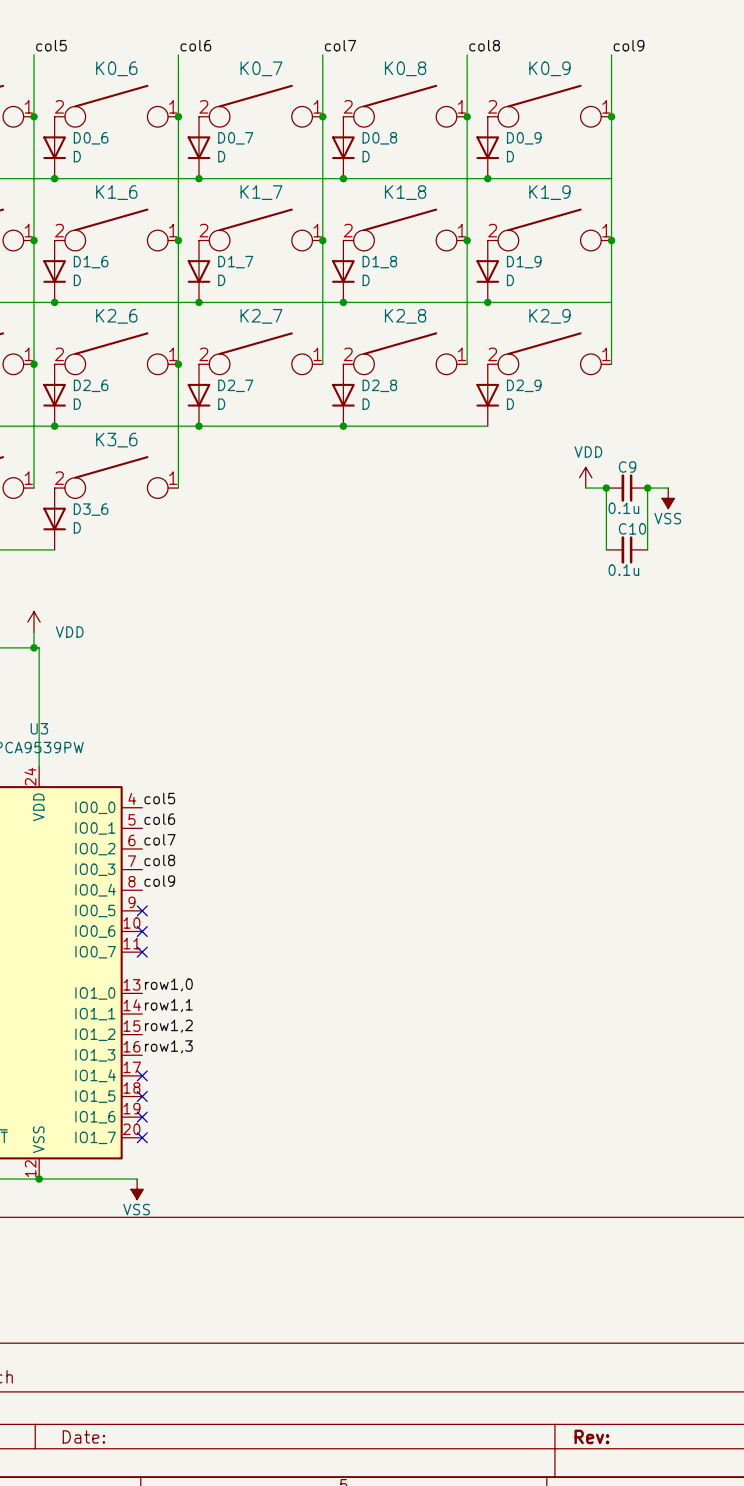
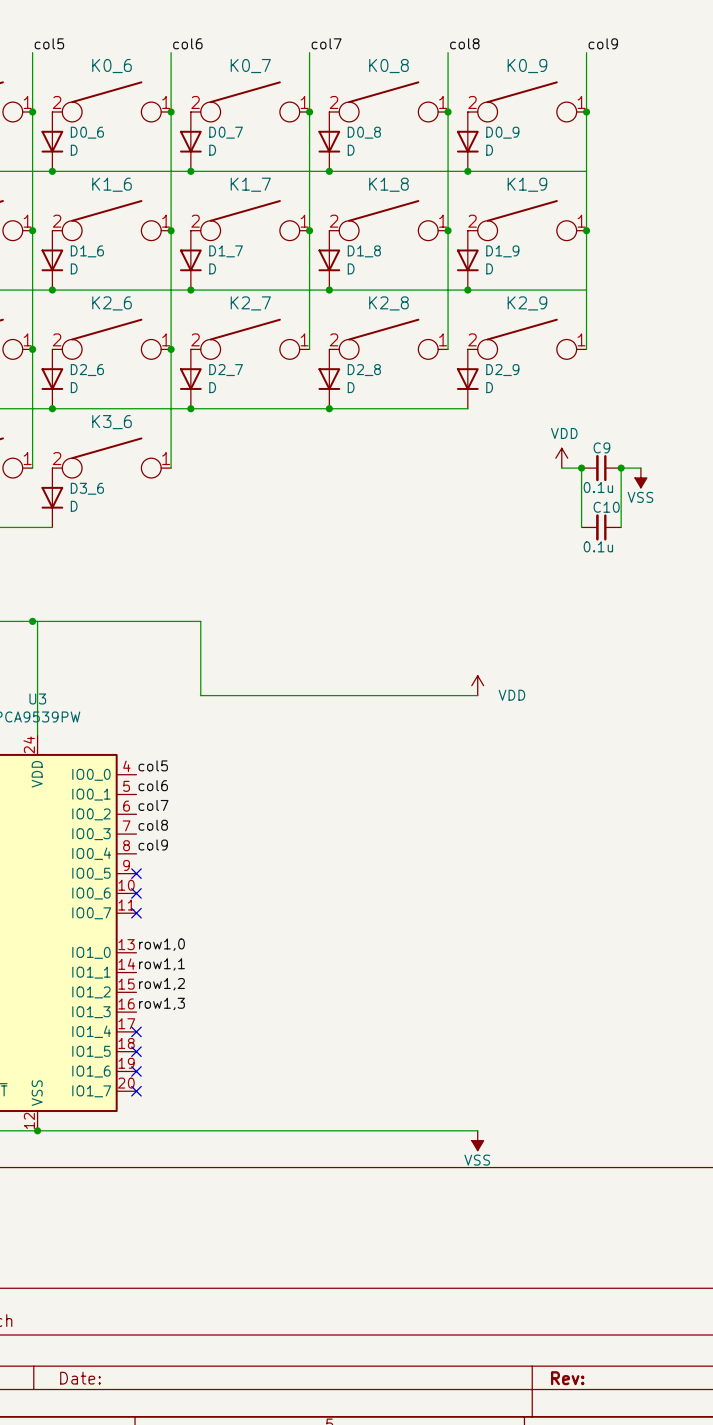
power symbol: VDD (33, 622) -> none
wire: (33, 632) (33, 647) -> none
wire: none -> (37, 621) (200, 621) (200, 695) (477, 695)
power symbol: none -> VDD (477, 685)
wire: none -> (131, 1130) (477, 1130)
power symbol: VSS (137, 1189) -> none
power symbol: none -> VSS (477, 1140)

